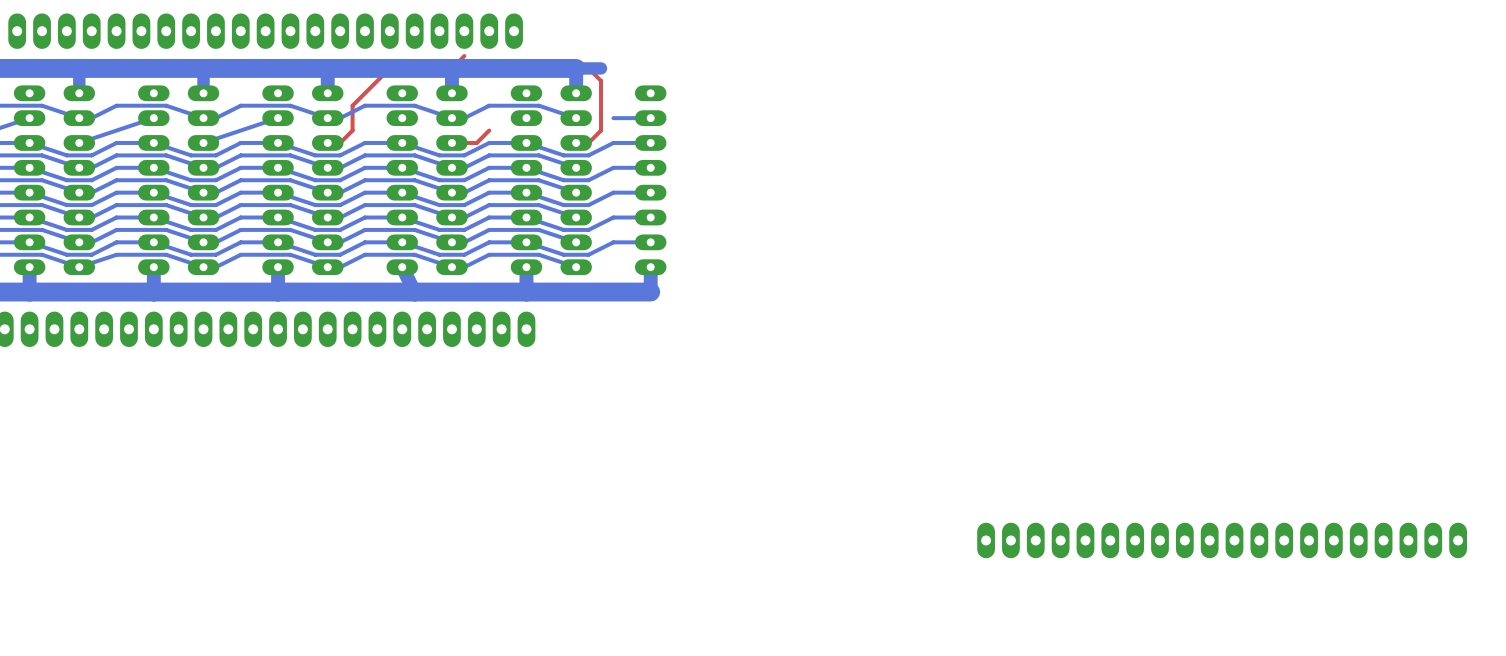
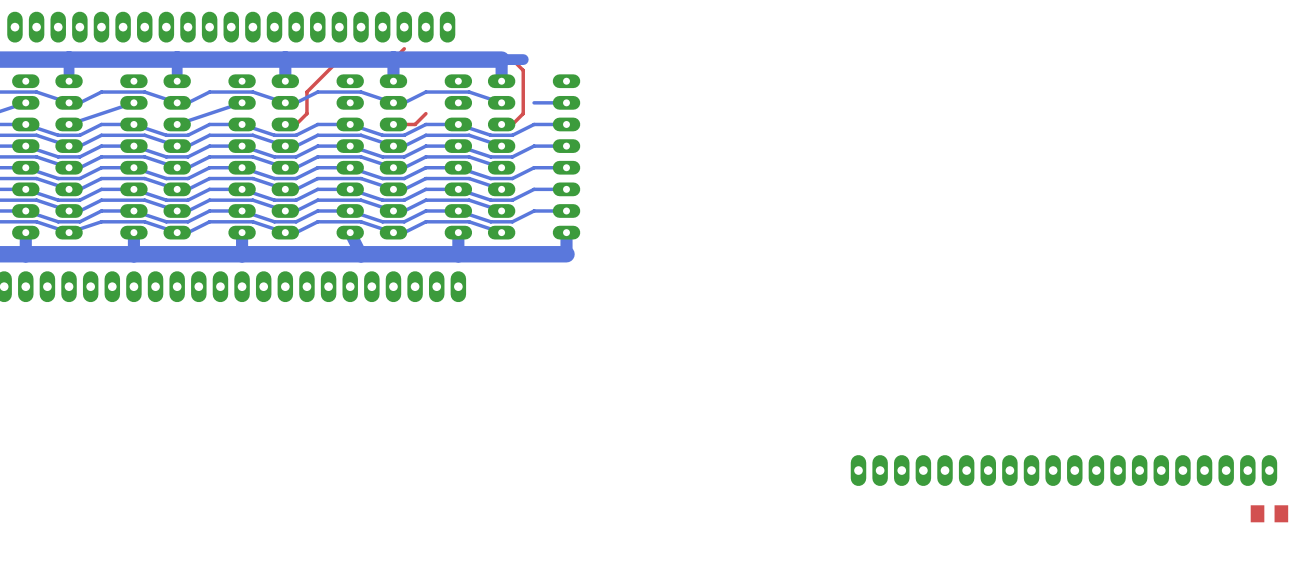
part: none -> (1269, 513)

